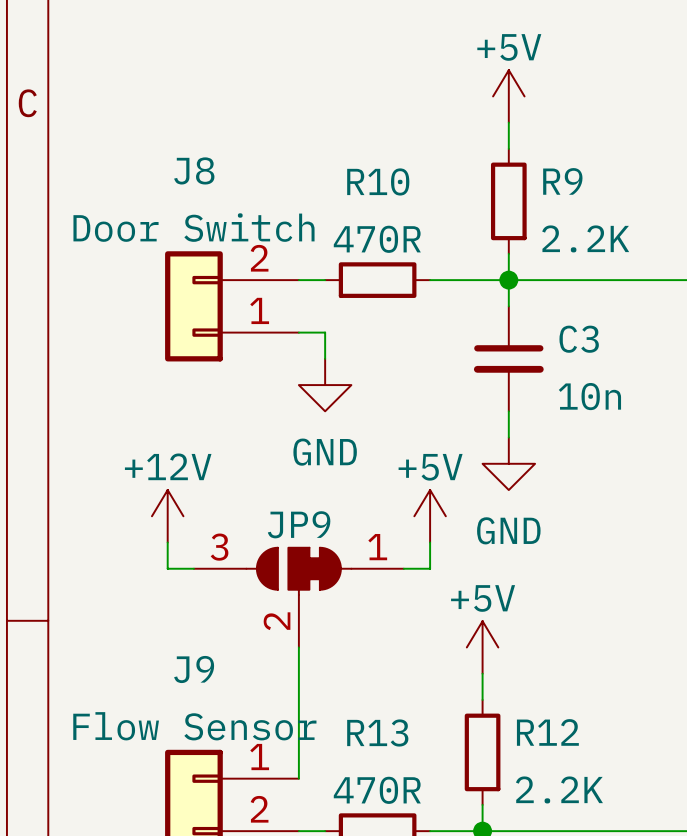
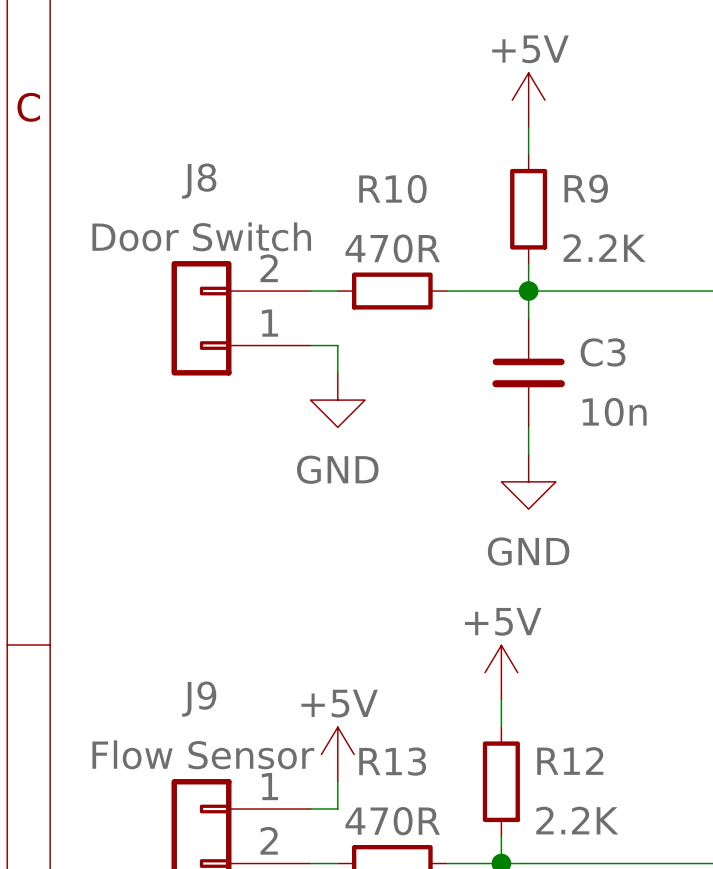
power symbol: +12V (167, 516) -> none
power symbol position: +5V (430, 516) -> +5V (337, 754)
wire: (167, 542) (167, 568) (193, 568) -> none
wire: (430, 542) (430, 568) (403, 568) -> none
JP9: (298, 597) -> none
wire: (298, 647) (298, 778) -> (337, 781) (337, 809) (310, 809)

